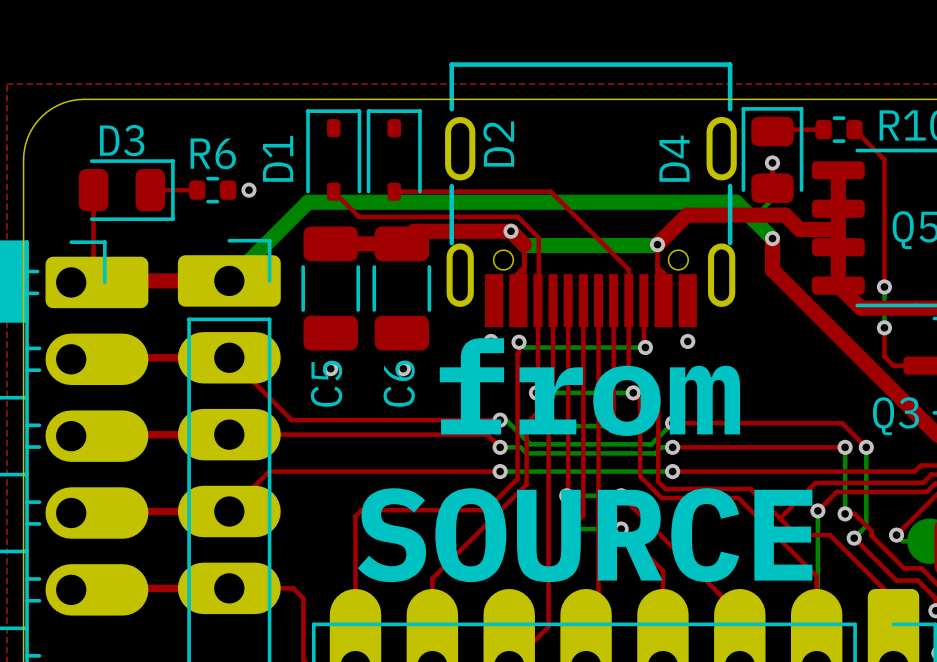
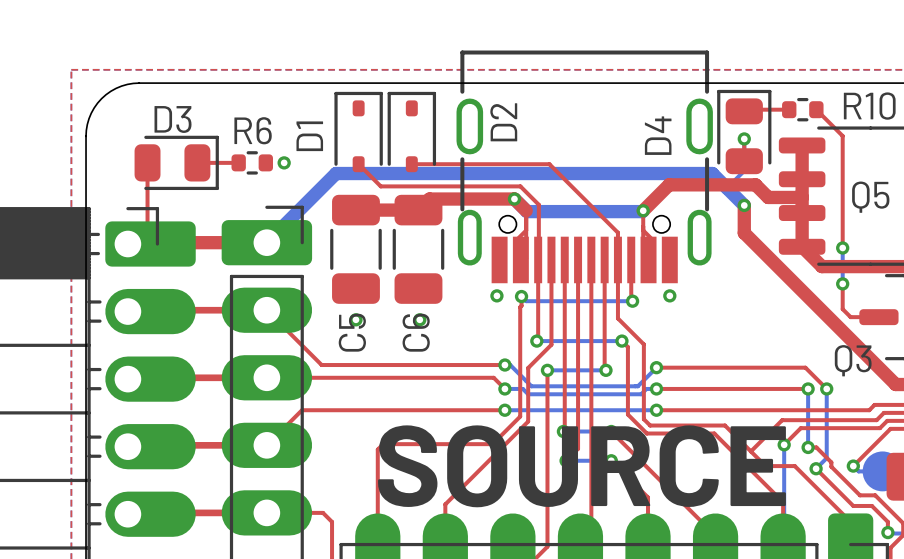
text: from (589, 387) -> none

